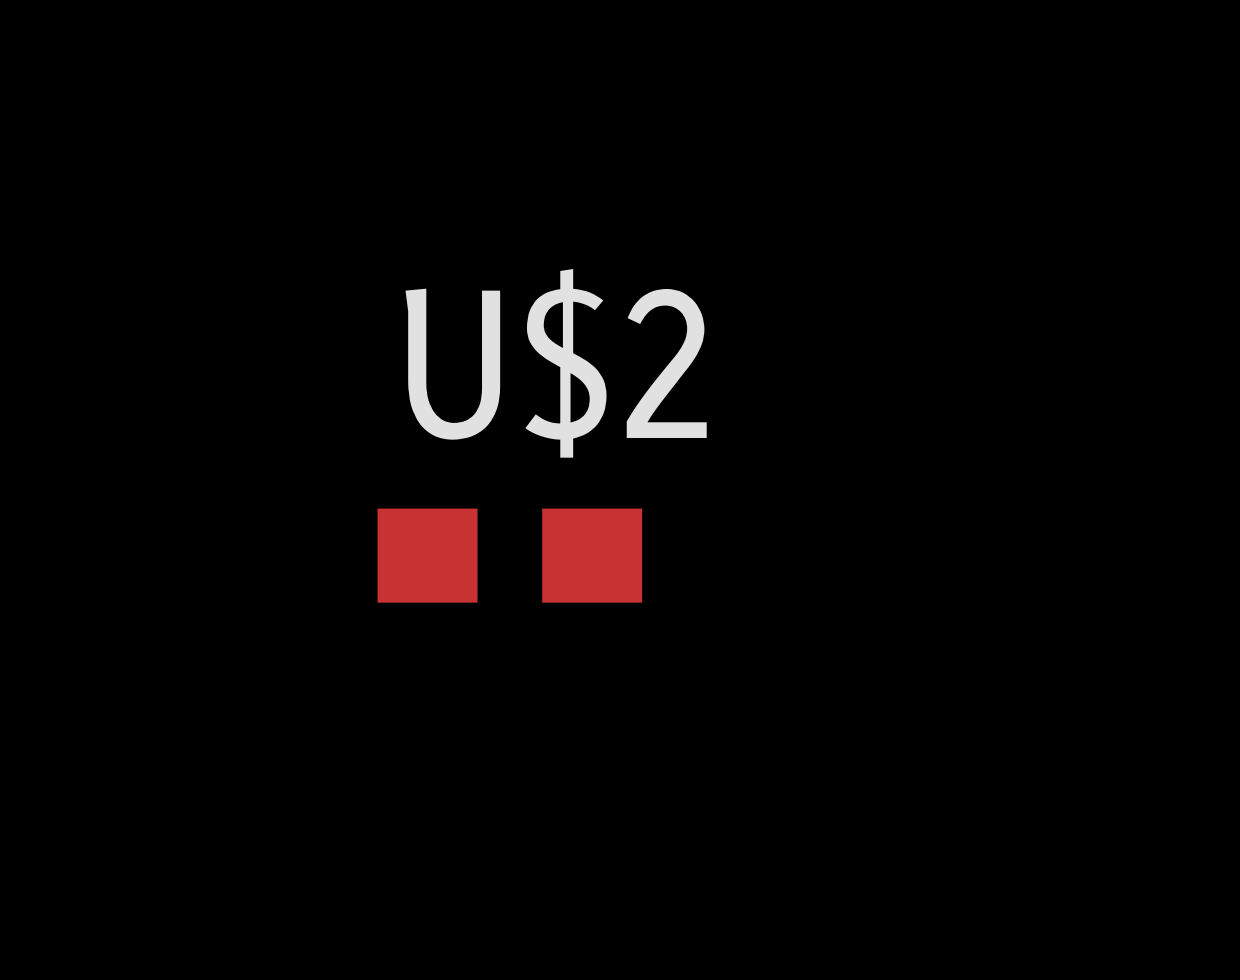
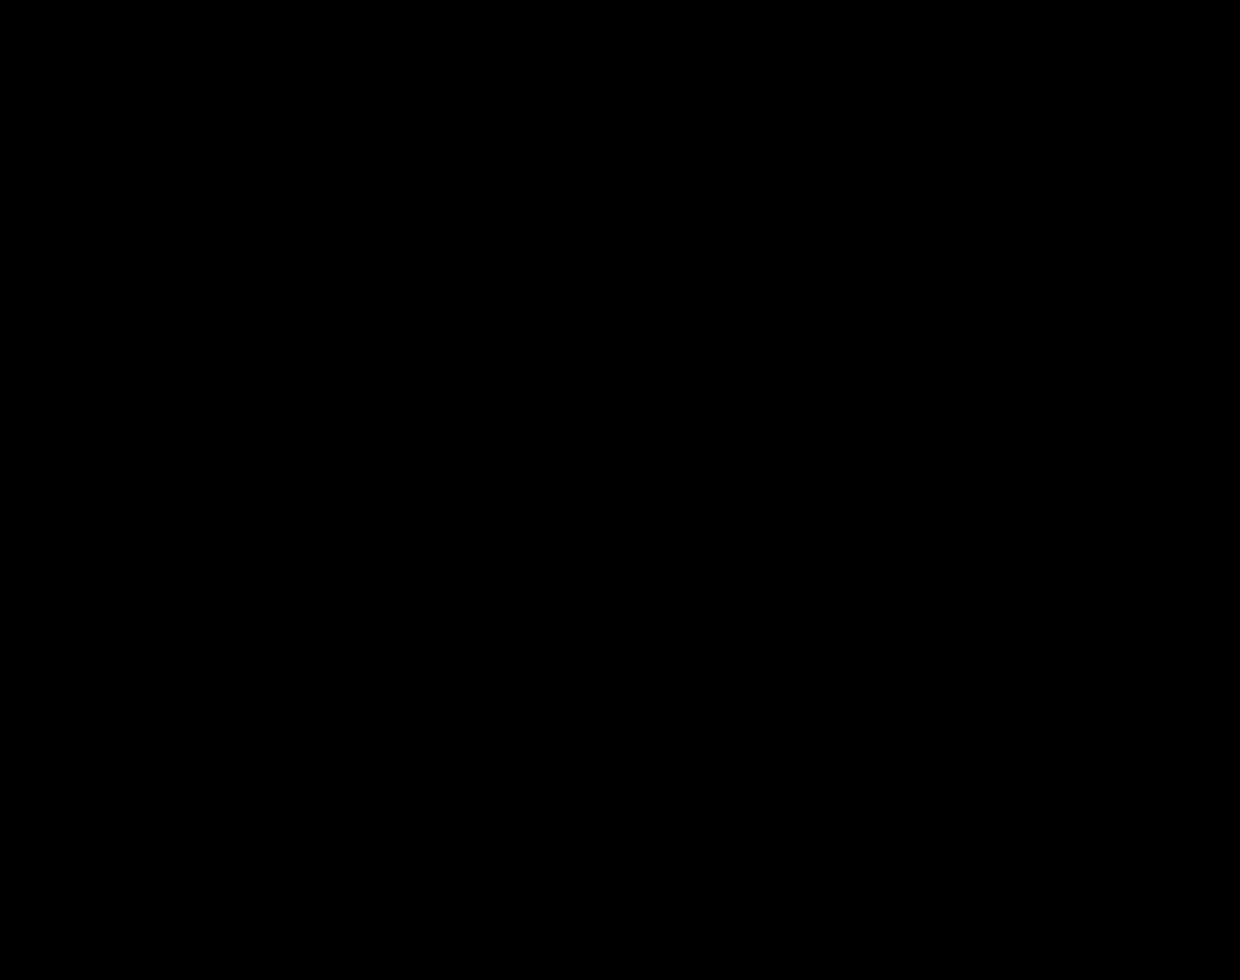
U$2: (509, 555) -> none

